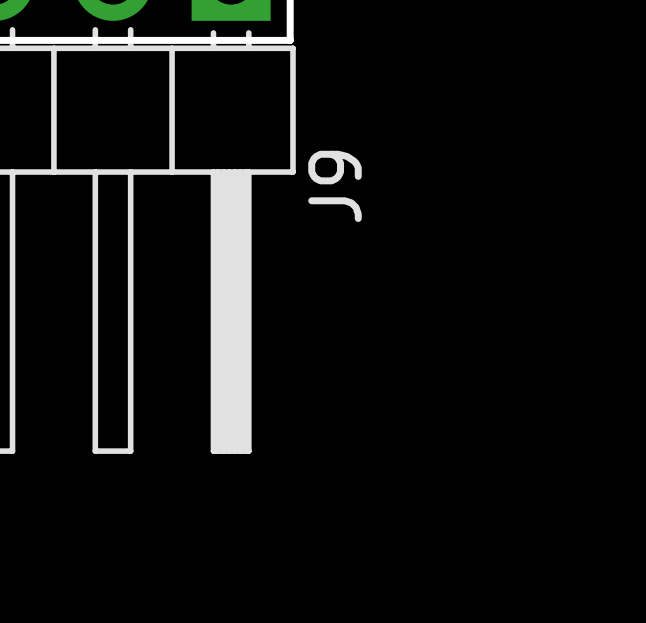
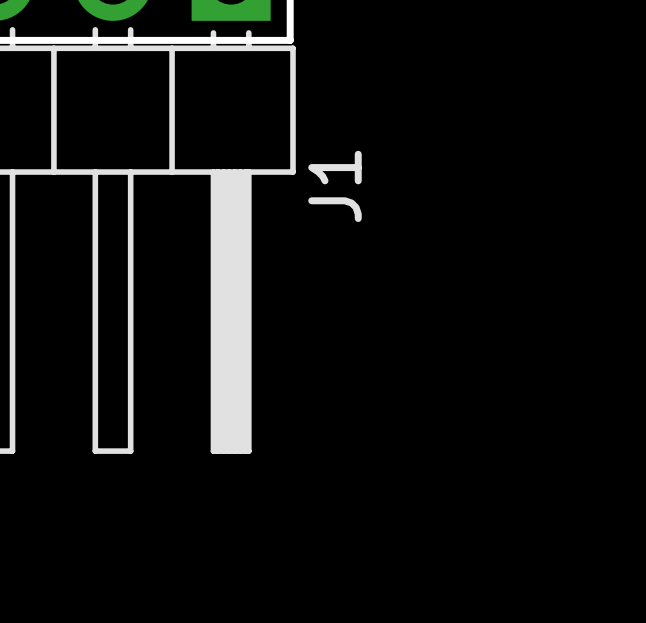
J9 name: J9 (334, 186) -> J1 (334, 186)

